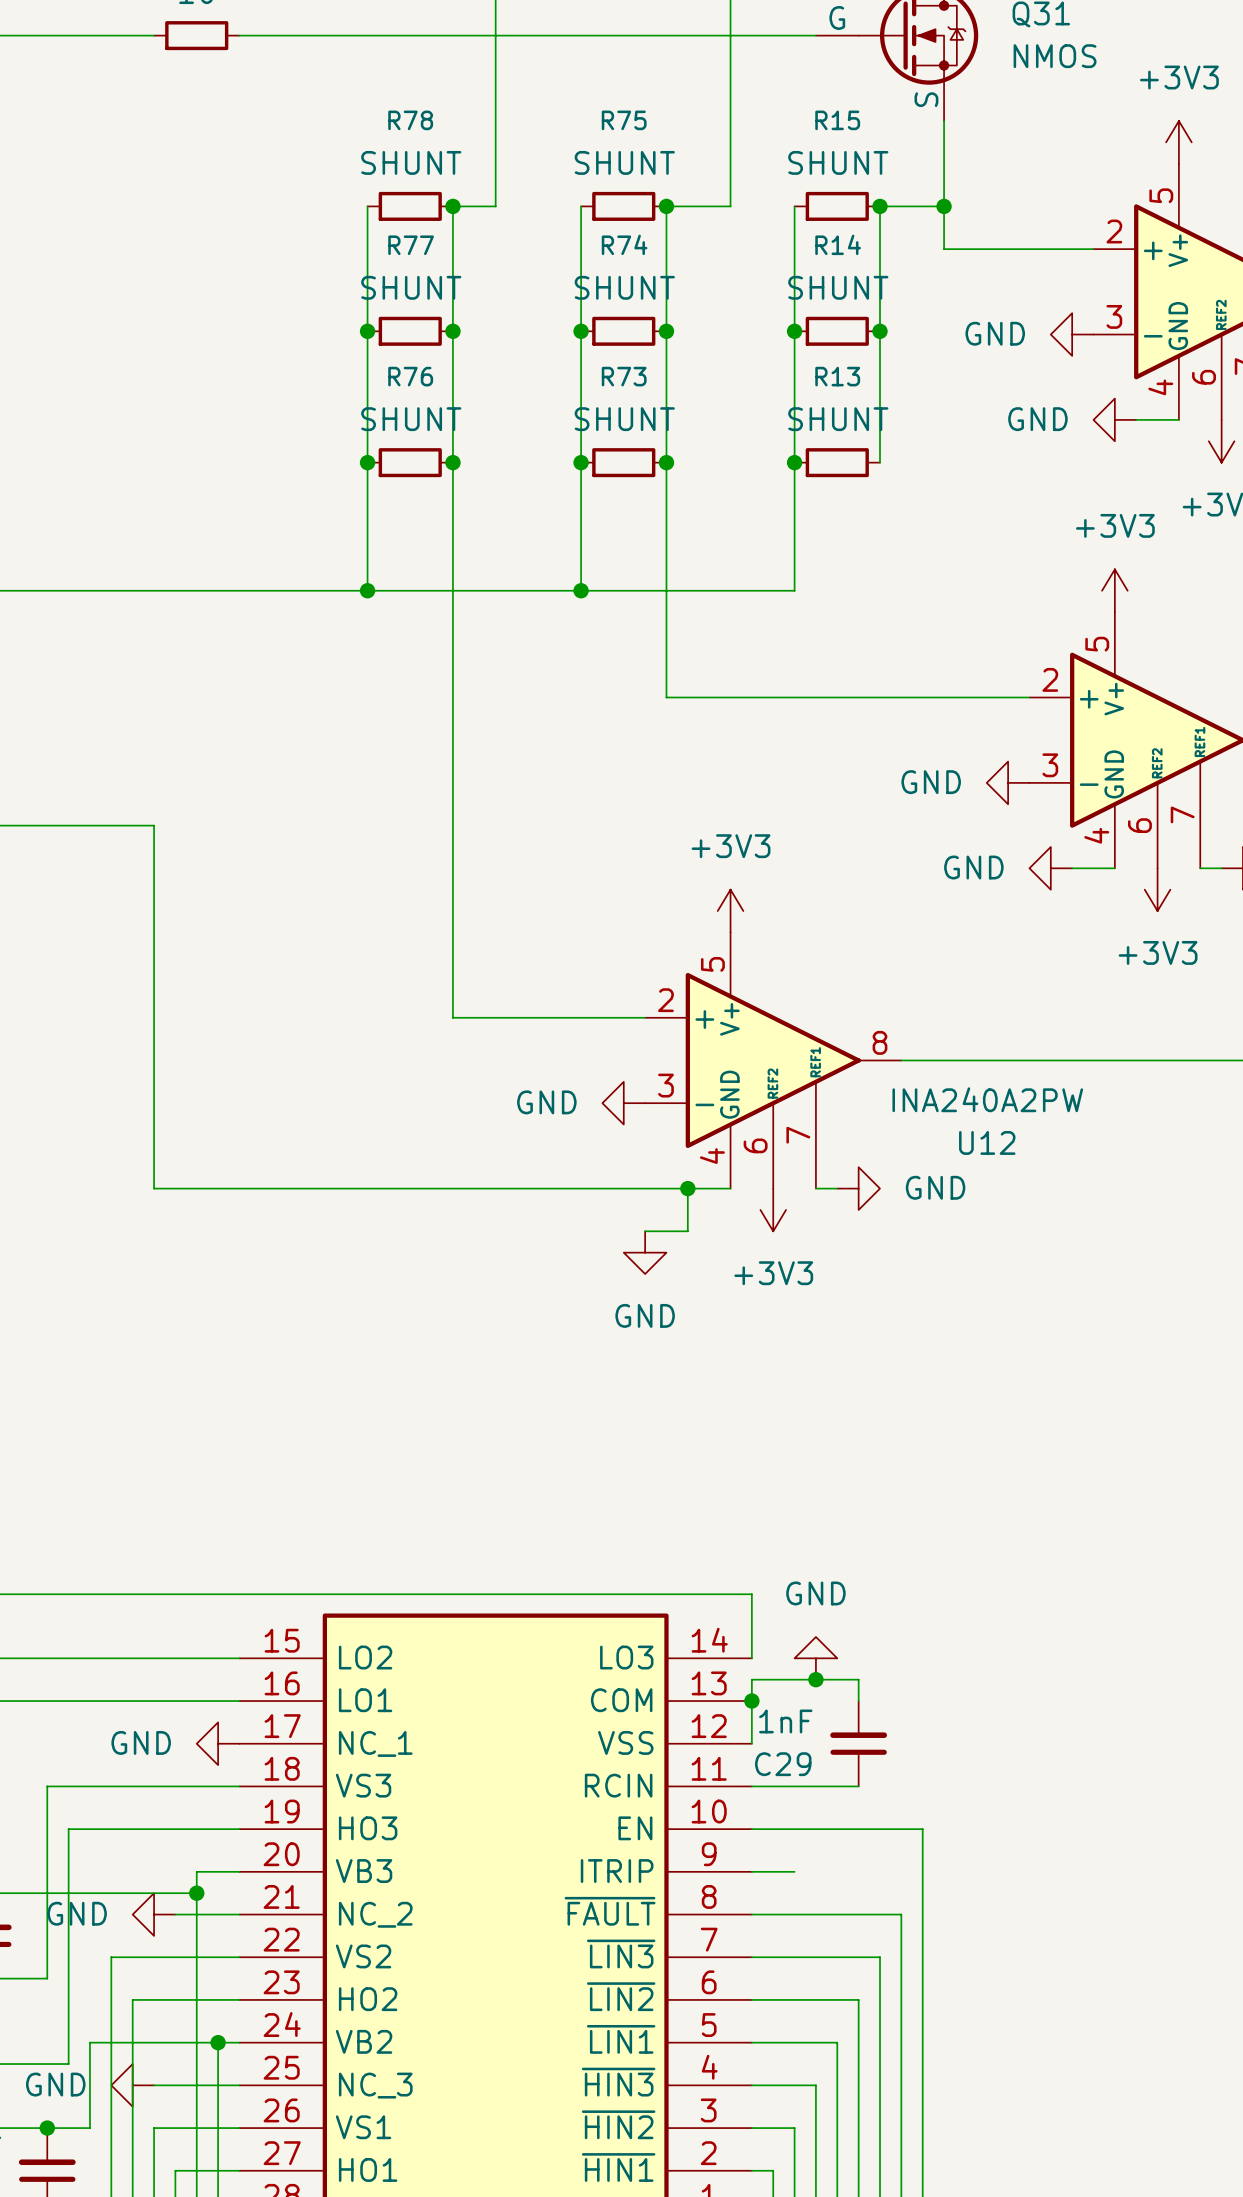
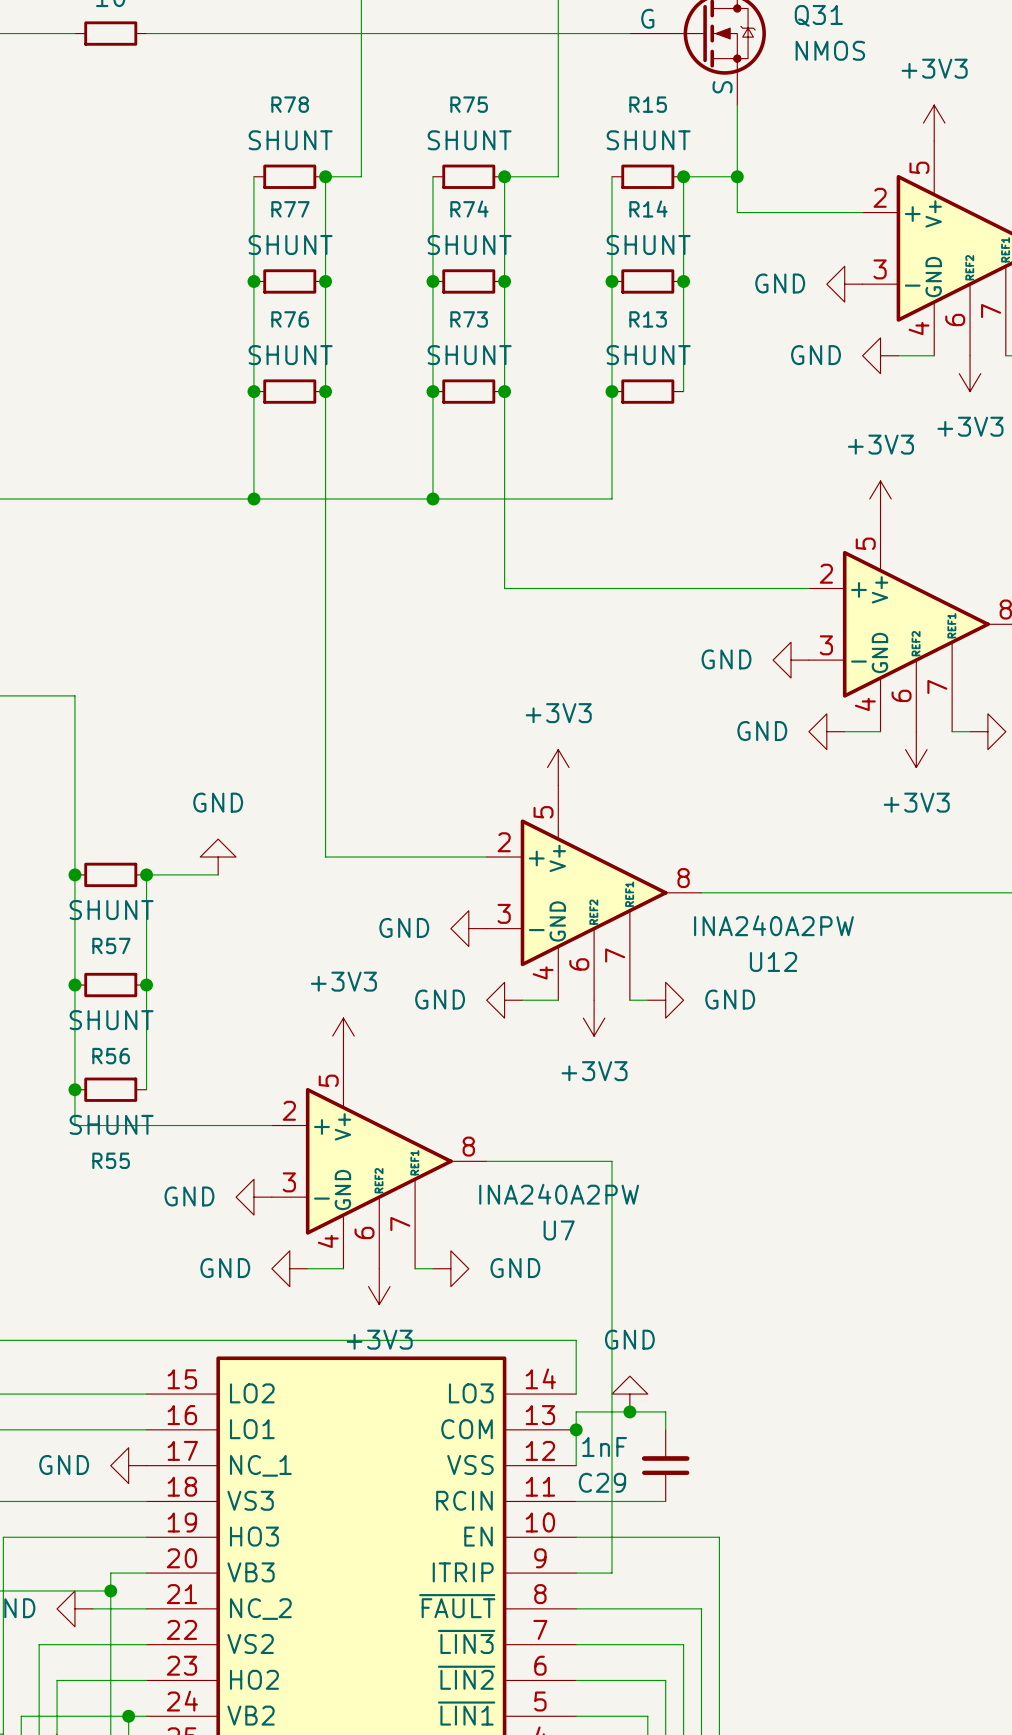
power symbol: none -> GND (218, 857)
junction: none -> (74, 874)
R57: none -> SHUNT (110, 874)
junction: none -> (146, 874)
wire: none -> (218, 874) (146, 874) (146, 1089)
junction: none -> (74, 985)
R56: none -> SHUNT (110, 985)
junction: none -> (146, 985)
wire: (154, 1188) (687, 1188) (687, 1231) (645, 1231) -> (74, 1000) (74, 1125) (271, 1125)
junction: (687, 1188) -> none
power symbol: none -> +3V3 (343, 1036)
power symbol rotation: 0° (645, 1252) -> 90° clockwise (504, 1000)
power symbol position: GND (645, 1252) -> GND (504, 1000)
junction: none -> (74, 1089)
R55: none -> SHUNT (110, 1089)
U7: none -> INA240A2PW (379, 1161)
wire: none -> (486, 1161) (611, 1161) (611, 1573)
power symbol: none -> GND (253, 1197)
power symbol: none -> GND (289, 1268)
wire: none -> (307, 1268) (343, 1268)
wire: none -> (415, 1268) (432, 1268)
power symbol: none -> GND (450, 1268)
power symbol: none -> +3V3 (379, 1286)

